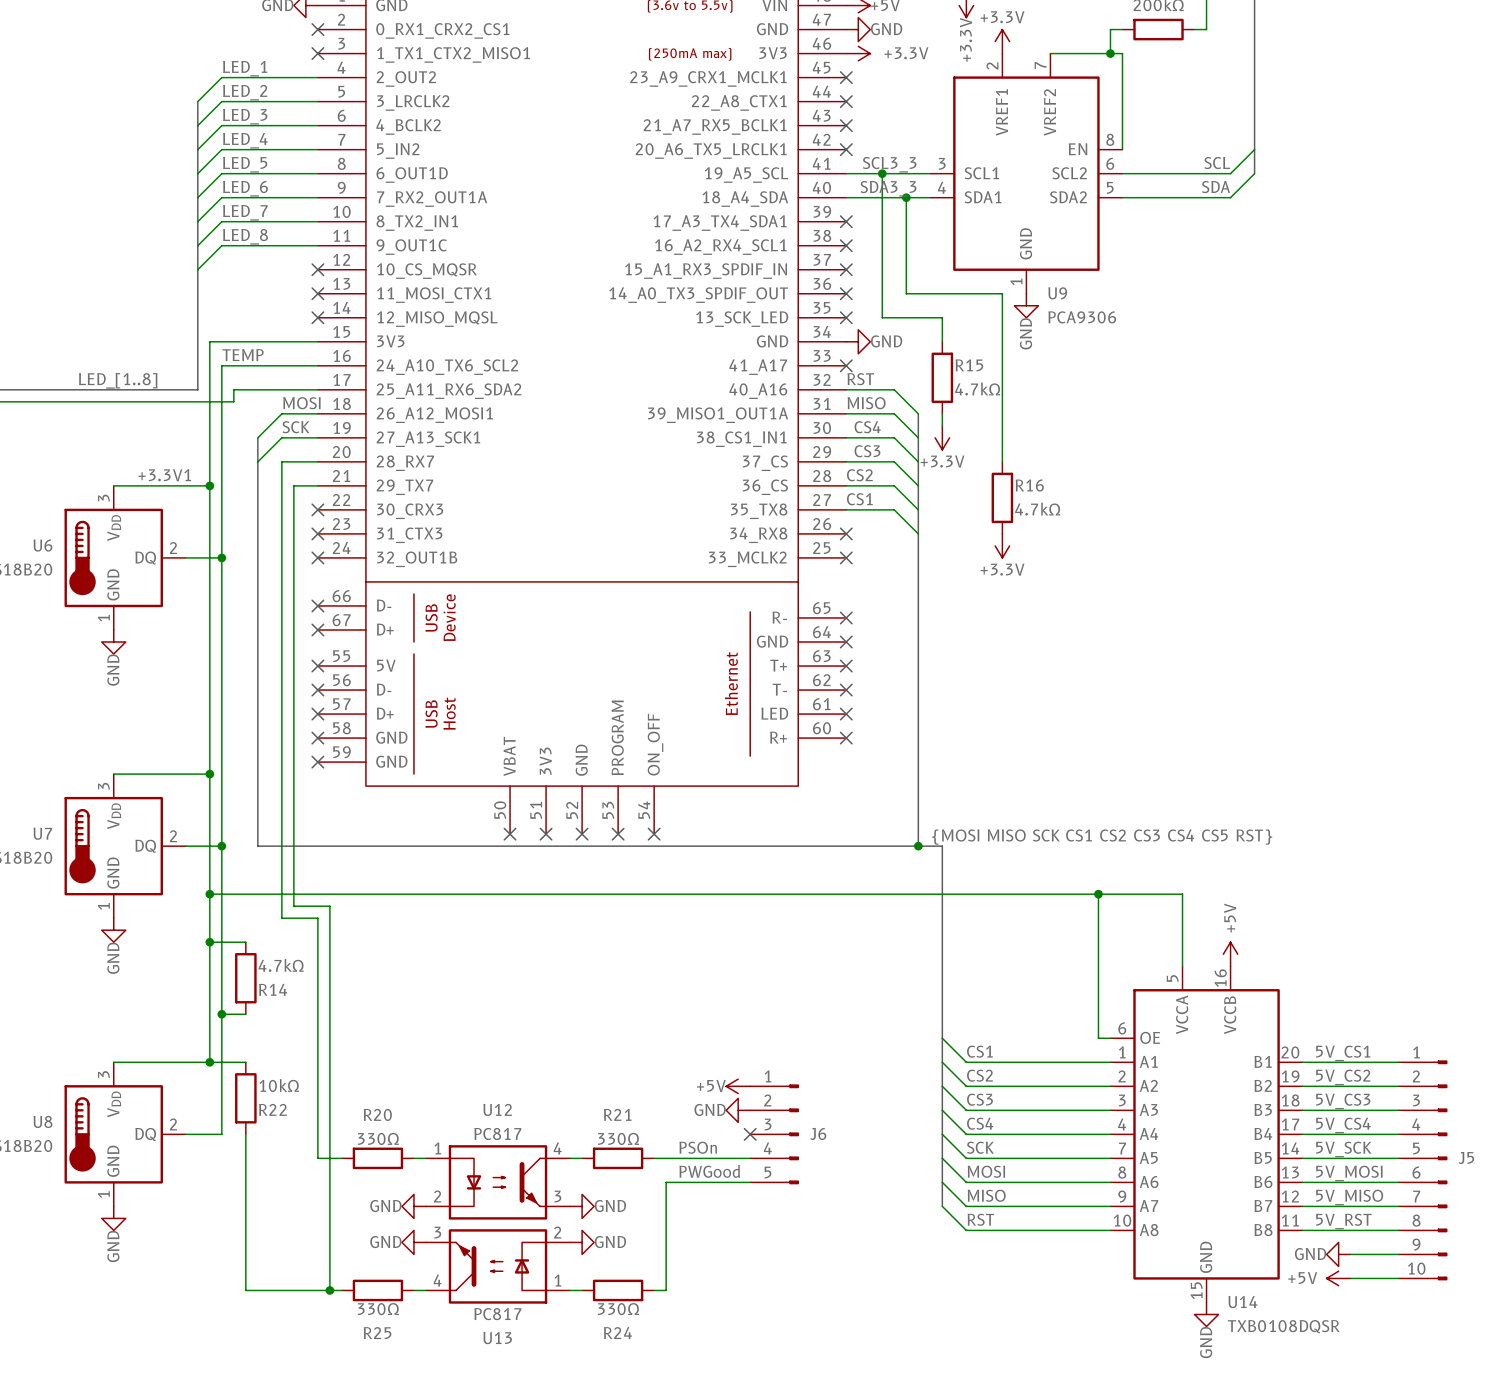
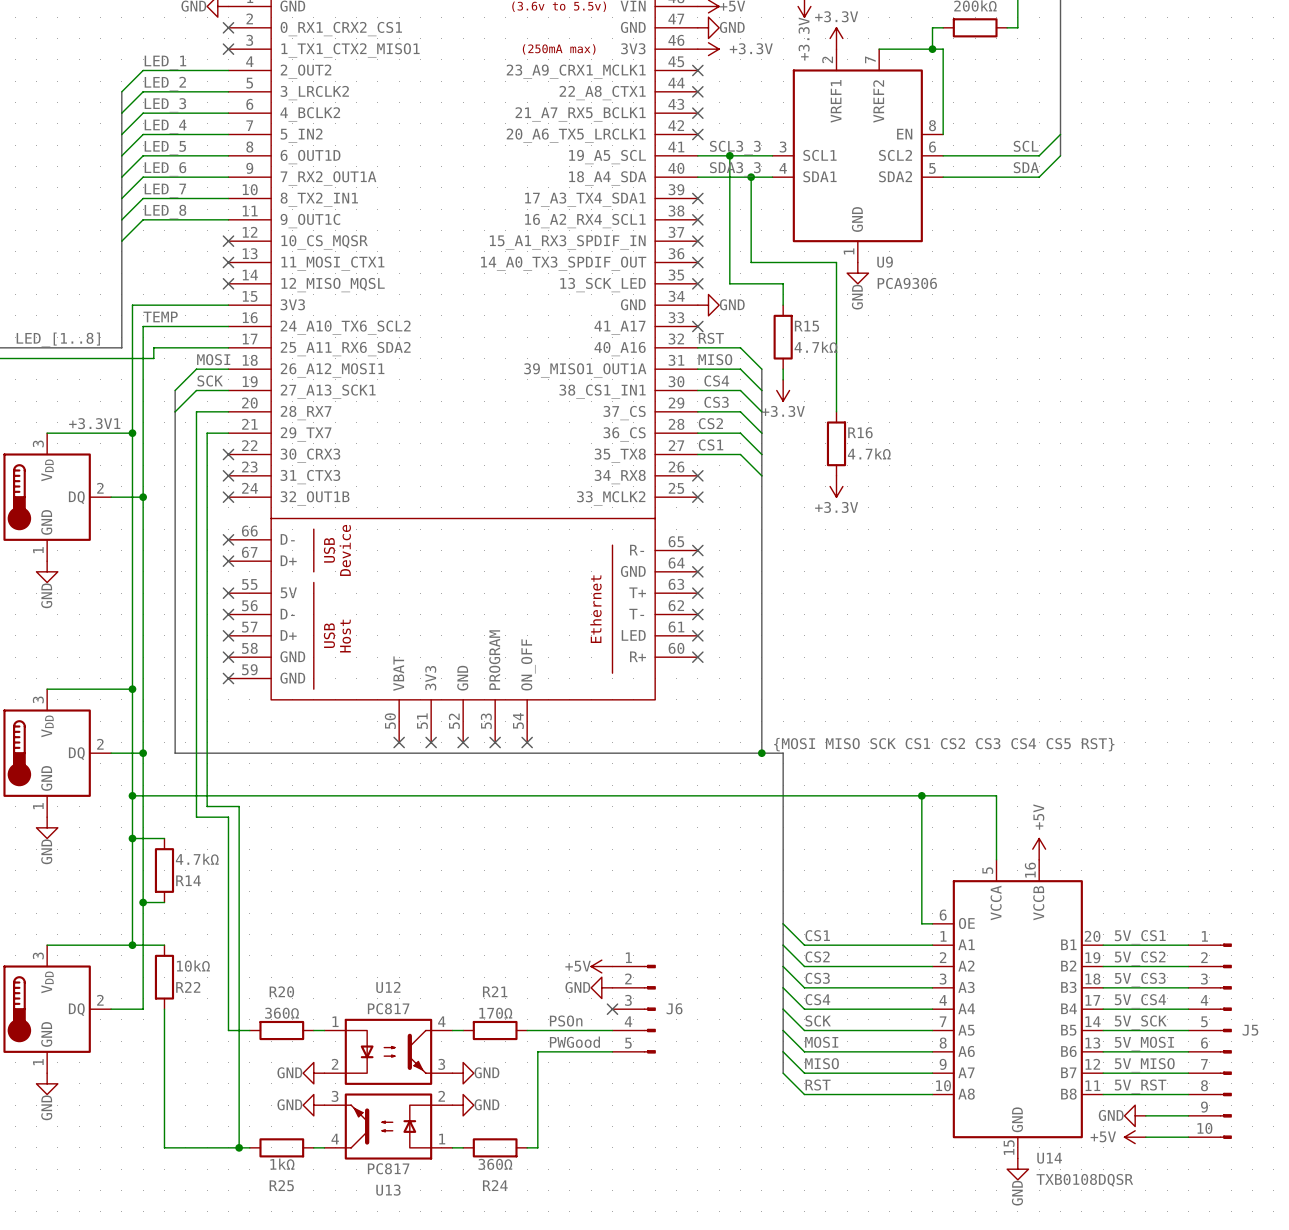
R20 value: 330Ω (378, 1138) -> 360Ω (282, 1013)
R21 value: 330Ω (618, 1138) -> 170Ω (495, 1013)
R25 value: 330Ω (378, 1309) -> 1kΩ (282, 1164)
R24 value: 330Ω (618, 1309) -> 360Ω (495, 1164)

